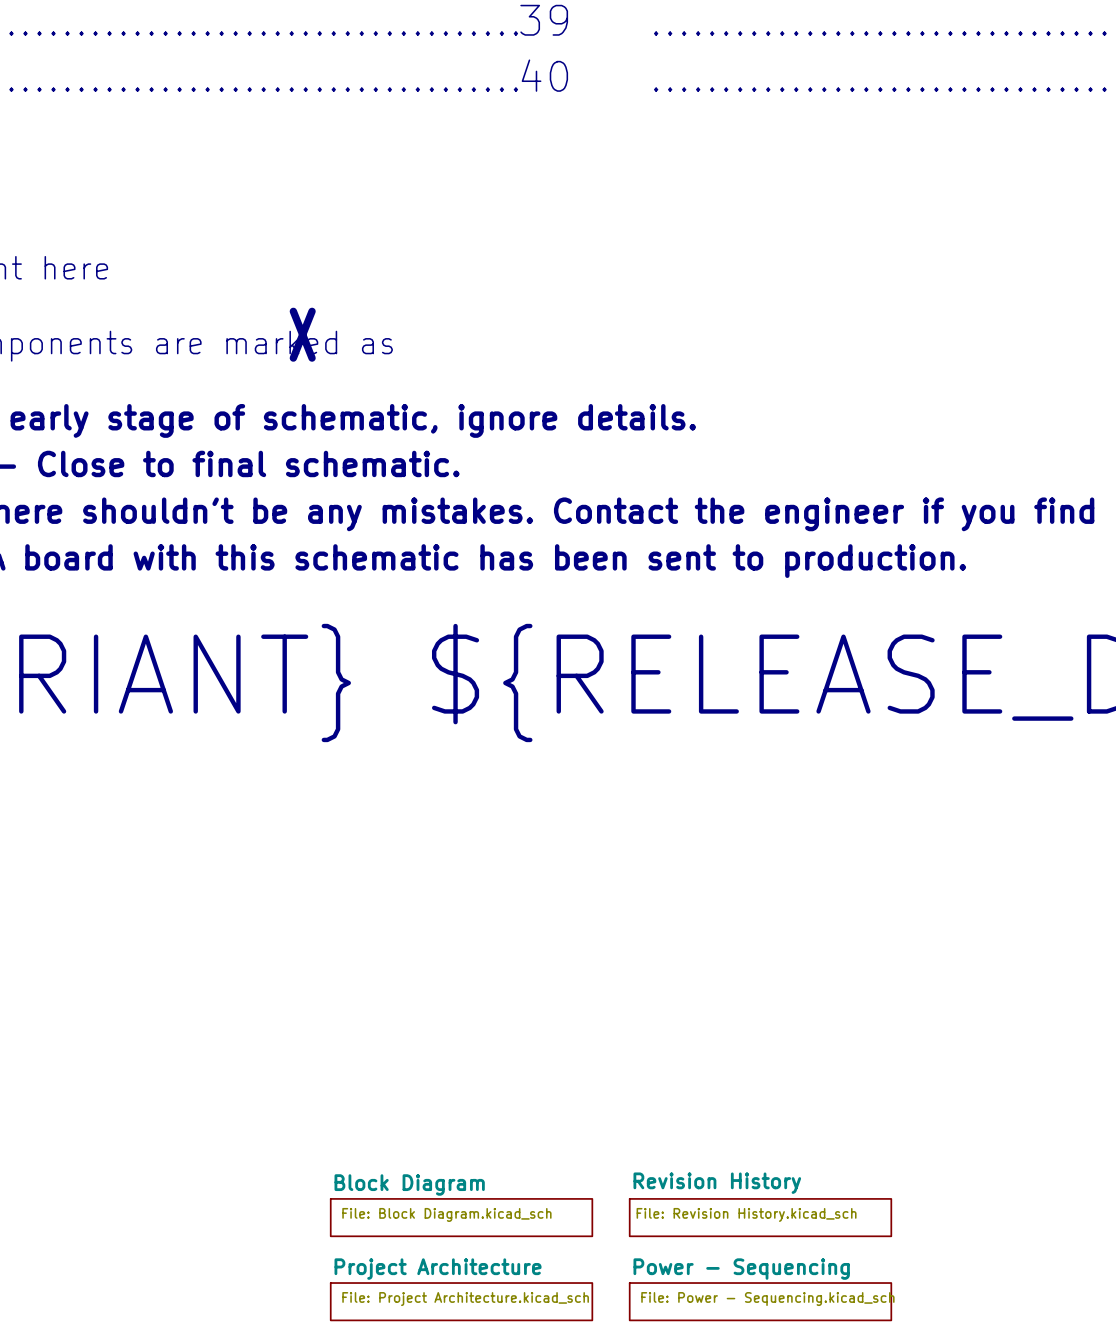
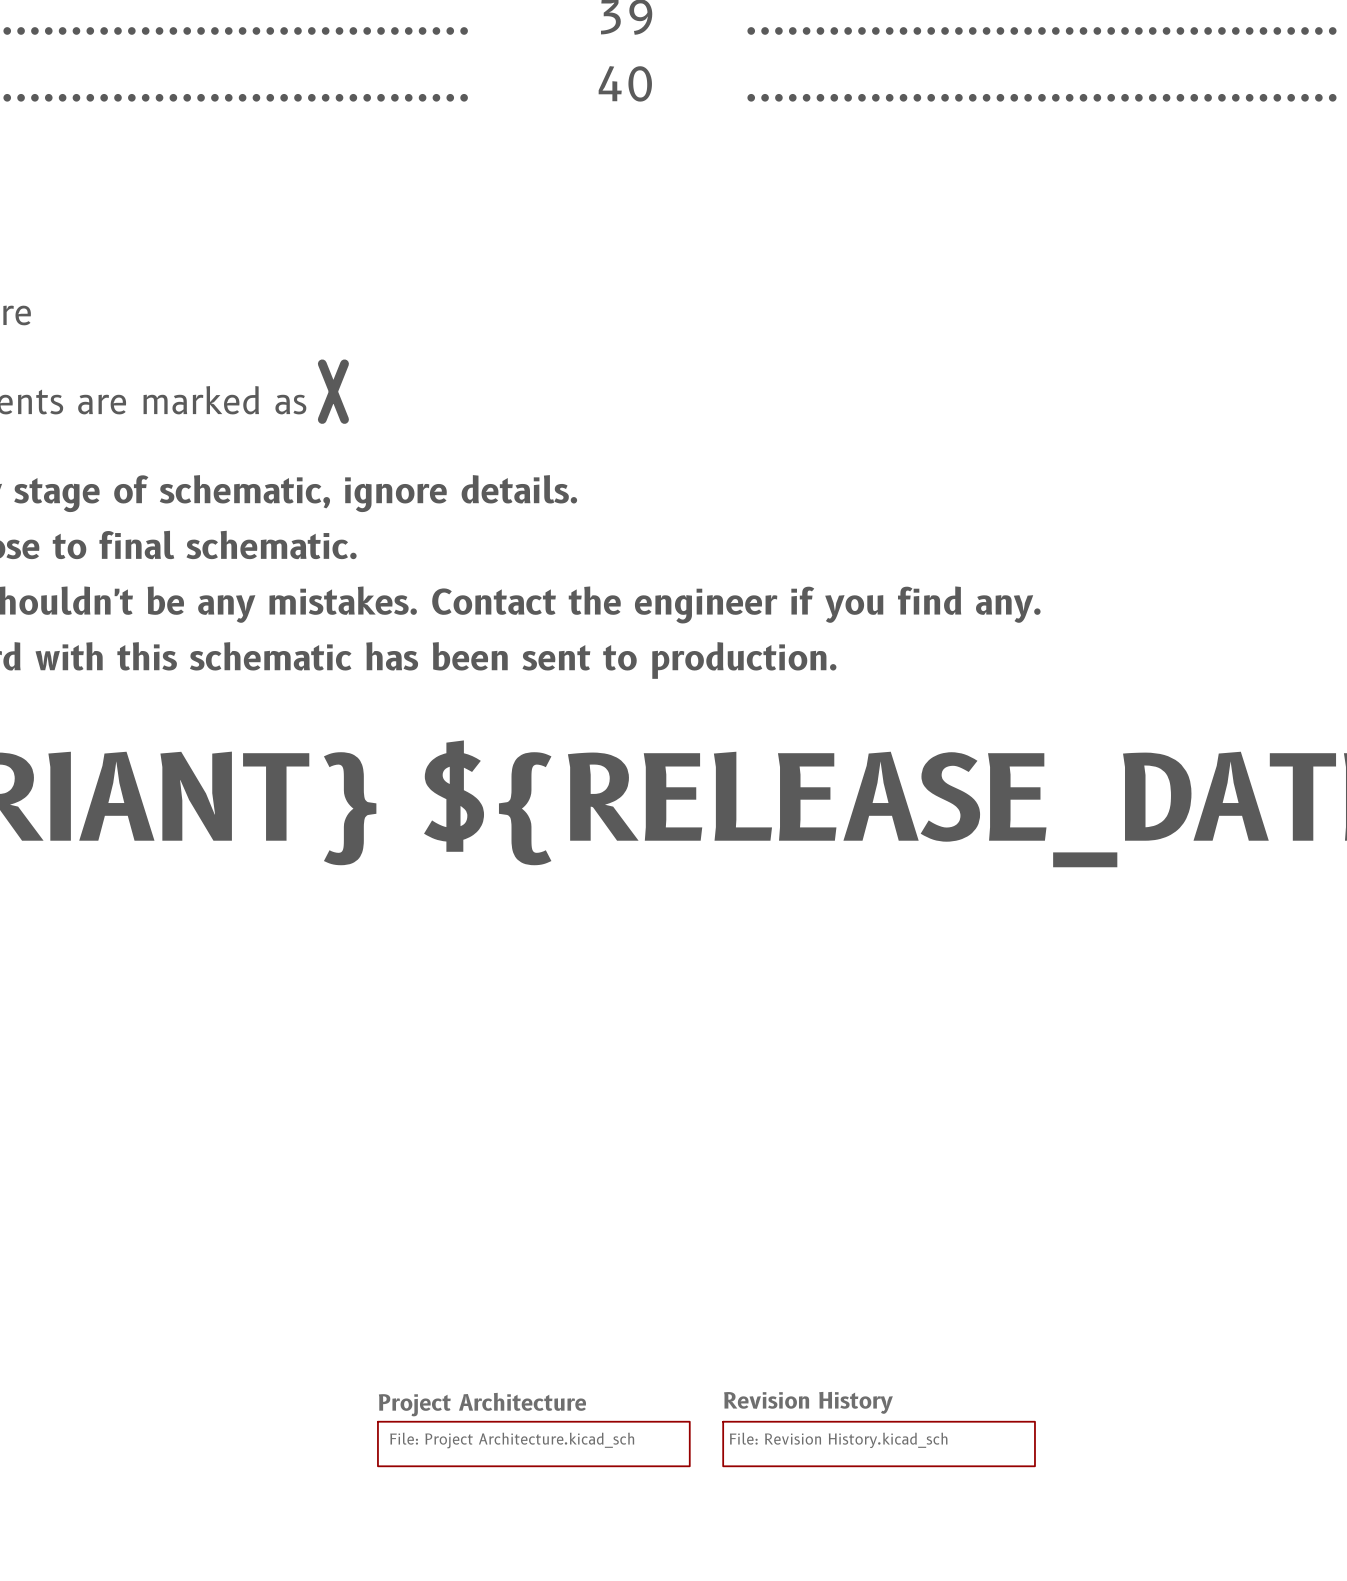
sheet Block Diagram: File: Block Diagram.kicad_sch (461, 1217) -> none
sheet Project Architecture position: (461, 1301) -> (533, 1444)
sheet Power - Sequencing: File: Power - Sequencing.kicad_sch (760, 1301) -> none

